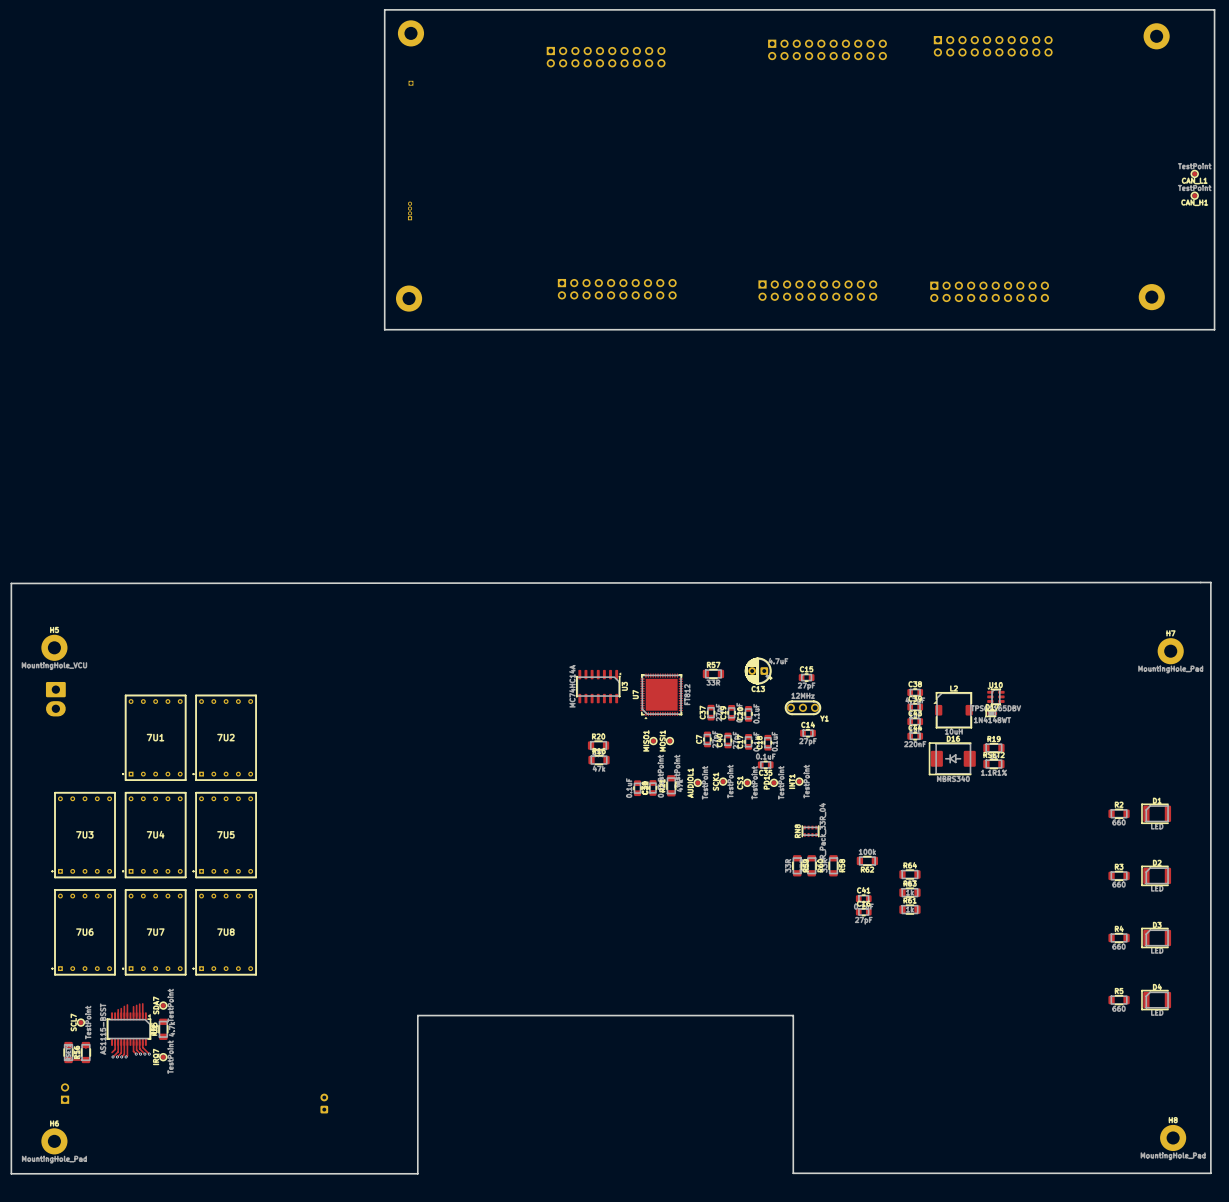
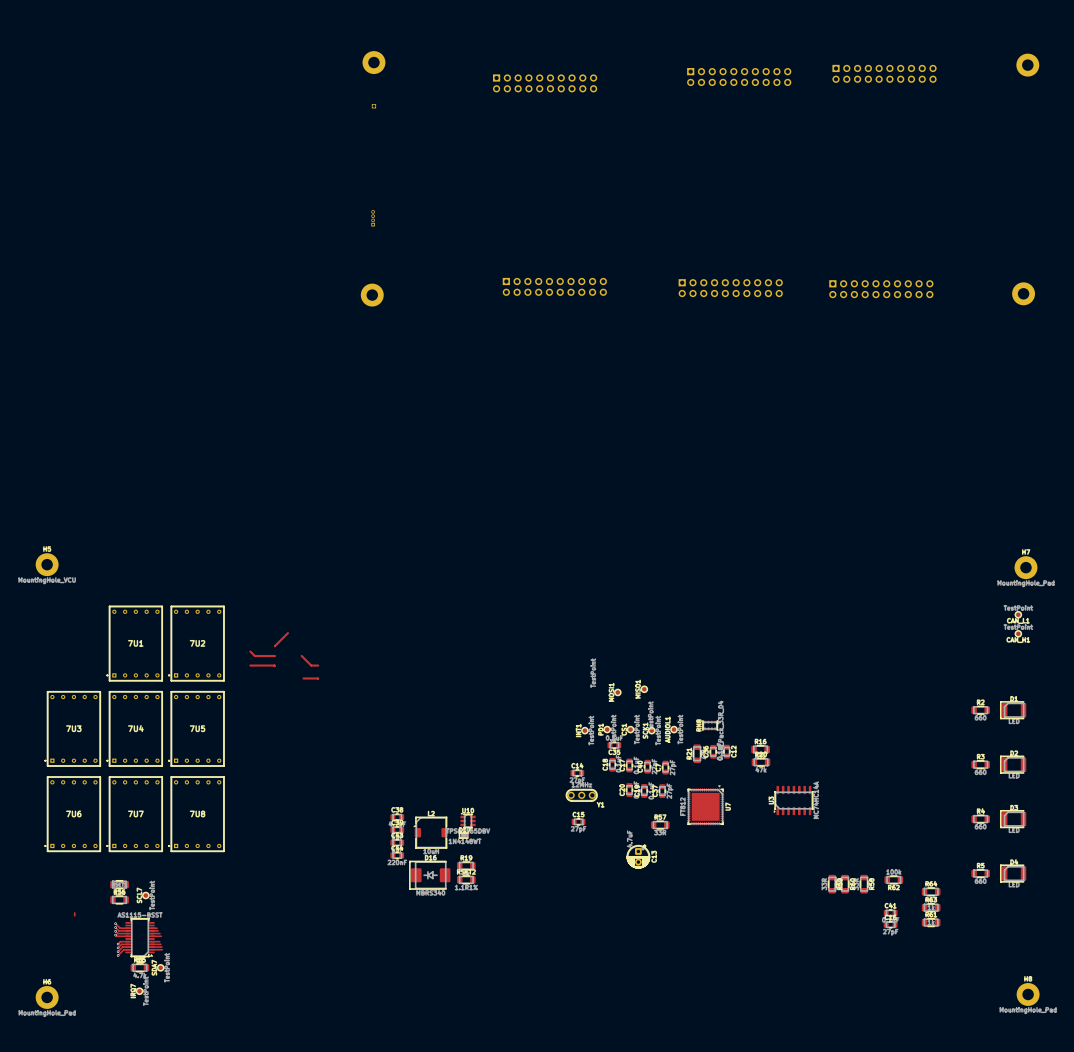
board edge: (384, 9) (1214, 9) (1214, 329) (384, 329) (384, 9) -> none
part position: (410, 33) -> (373, 62)
part position: (1156, 36) -> (1027, 65)
part position: (993, 46) -> (884, 73)
part position: (827, 49) -> (739, 77)
part position: (606, 57) -> (545, 83)
part position: (410, 83) -> (373, 106)
part position: (1194, 173) -> (1018, 614)
part position: (1194, 195) -> (1018, 633)
part position: (410, 210) -> (373, 218)
part position: (617, 289) -> (554, 286)
part position: (817, 290) -> (730, 288)
part position: (989, 291) -> (881, 289)
part position: (1151, 297) -> (1023, 293)
part position: (409, 298) -> (372, 295)
board edge: (1200, 582) (1210, 582) (1210, 1173) (793, 1173) (793, 1015) (417, 1015) (417, 1173) (11, 1173) (11, 583) (1200, 582) -> none
part rotation: 0° (758, 671) -> 90° counterclockwise (638, 856)
part position: (758, 671) -> (638, 856)
part position: (713, 673) -> (660, 825)
part position: (806, 677) -> (578, 821)
part rotation: 0° (598, 686) -> 180° (793, 800)
part position: (598, 686) -> (793, 800)
part position: (915, 692) -> (397, 817)
part rotation: 0° (661, 696) -> 180° (705, 805)
part position: (661, 696) -> (705, 805)
part position: (995, 696) -> (468, 820)
part: (55, 699) -> none
part position: (802, 707) -> (581, 795)
part position: (915, 707) -> (397, 829)
part position: (953, 710) -> (430, 832)
part position: (711, 712) -> (662, 791)
part position: (731, 712) -> (644, 790)
part position: (748, 713) -> (629, 790)
part position: (991, 713) -> (464, 835)
part position: (915, 721) -> (397, 842)
track: none -> (287, 633) (274, 646)
part position: (807, 733) -> (577, 773)
part position: (915, 736) -> (397, 855)
part position: (707, 739) -> (665, 767)
part position: (727, 740) -> (647, 766)
part position: (653, 741) -> (644, 689)
part position: (669, 741) -> (617, 692)
part position: (748, 741) -> (629, 765)
part position: (767, 742) -> (612, 764)
part position: (598, 745) -> (761, 762)
track: none -> (250, 651) (254, 656) (274, 656)
part position: (993, 748) -> (466, 865)
track: none -> (301, 656) (311, 665) (318, 665)
part position: (952, 758) -> (430, 875)
part position: (599, 760) -> (760, 749)
track: none -> (250, 665) (274, 665)
part position: (765, 764) -> (614, 745)
part position: (993, 764) -> (466, 879)
track: none -> (303, 678) (318, 678)
part position: (723, 781) -> (651, 730)
part position: (799, 781) -> (584, 730)
part position: (697, 782) -> (674, 729)
part position: (747, 782) -> (630, 729)
part position: (773, 782) -> (607, 729)
part position: (671, 785) -> (697, 753)
part position: (652, 787) -> (713, 751)
part position: (637, 788) -> (726, 751)
part position: (867, 860) -> (893, 879)
part position: (797, 865) -> (832, 884)
part position: (811, 865) -> (845, 884)
part position: (833, 865) -> (864, 884)
part position: (909, 874) -> (931, 891)
part position: (909, 892) -> (931, 907)
part position: (863, 898) -> (890, 913)
part position: (909, 909) -> (931, 922)
part position: (863, 912) -> (890, 924)
track: (142, 1003) (142, 1016) -> none
track: (127, 1004) (127, 1016) -> none
track: (139, 1004) (139, 1016) -> none
track: (136, 1005) (136, 1016) -> none
part position: (163, 1005) -> (160, 967)
track: (124, 1006) (124, 1016) -> none
track: (133, 1006) (133, 1016) -> none
track: (121, 1008) (121, 1016) -> none
track: (118, 1009) (118, 1016) -> none
part position: (80, 1022) -> (145, 895)
part rotation: 0° (128, 1029) -> 90° clockwise (140, 937)
part position: (128, 1029) -> (140, 937)
part rotation: 0° (163, 1029) -> 90° clockwise (139, 967)
part position: (163, 1029) -> (139, 967)
track: (115, 1041) (115, 1049) (112, 1052) -> none
track: (118, 1041) (118, 1051) (113, 1056) -> none
track: (121, 1041) (121, 1053) (117, 1056) -> none
track: (124, 1041) (124, 1054) (121, 1056) -> none
track: (127, 1041) (126, 1056) -> none
track: (133, 1041) (133, 1051) (136, 1054) -> none
track: (136, 1041) (136, 1050) (140, 1054) -> none
track: (139, 1041) (139, 1048) (144, 1054) -> none
track: (142, 1041) (142, 1047) (149, 1054) -> none
part rotation: 0° (68, 1052) -> 90° clockwise (119, 884)
part position: (68, 1052) -> (119, 884)
part rotation: 0° (85, 1052) -> 90° clockwise (119, 899)
part position: (85, 1052) -> (119, 899)
via: (136, 1054) -> none
via: (140, 1054) -> none
via: (144, 1054) -> none
via: (149, 1054) -> none
via: (113, 1056) -> none
via: (117, 1056) -> none
via: (121, 1056) -> none
via: (126, 1056) -> none
track: none -> (115, 923) (120, 928) (128, 928)
via: none -> (115, 923)
part position: (163, 1057) -> (139, 991)
track: (68, 1060) (87, 1060) -> none
track: none -> (115, 927) (119, 930) (128, 930)
via: none -> (115, 927)
track: none -> (151, 928) (157, 928)
track: none -> (115, 931) (117, 933) (128, 933)
via: none -> (115, 931)
track: none -> (151, 930) (158, 930)
track: none -> (151, 933) (159, 933)
track: none -> (115, 935) (128, 936)
via: none -> (115, 935)
track: none -> (151, 936) (161, 936)
track: none -> (128, 941) (120, 941) (118, 944)
track: none -> (151, 941) (159, 941)
via: none -> (118, 944)
track: none -> (128, 944) (121, 944) (118, 947)
track: none -> (151, 944) (160, 944)
track: none -> (128, 947) (122, 947) (118, 951)
track: none -> (151, 947) (161, 947)
via: none -> (118, 947)
track: none -> (128, 949) (123, 949) (118, 955)
track: none -> (151, 949) (162, 949)
via: none -> (118, 951)
part: (65, 1093) -> none
via: none -> (118, 955)
part: (324, 1103) -> none

